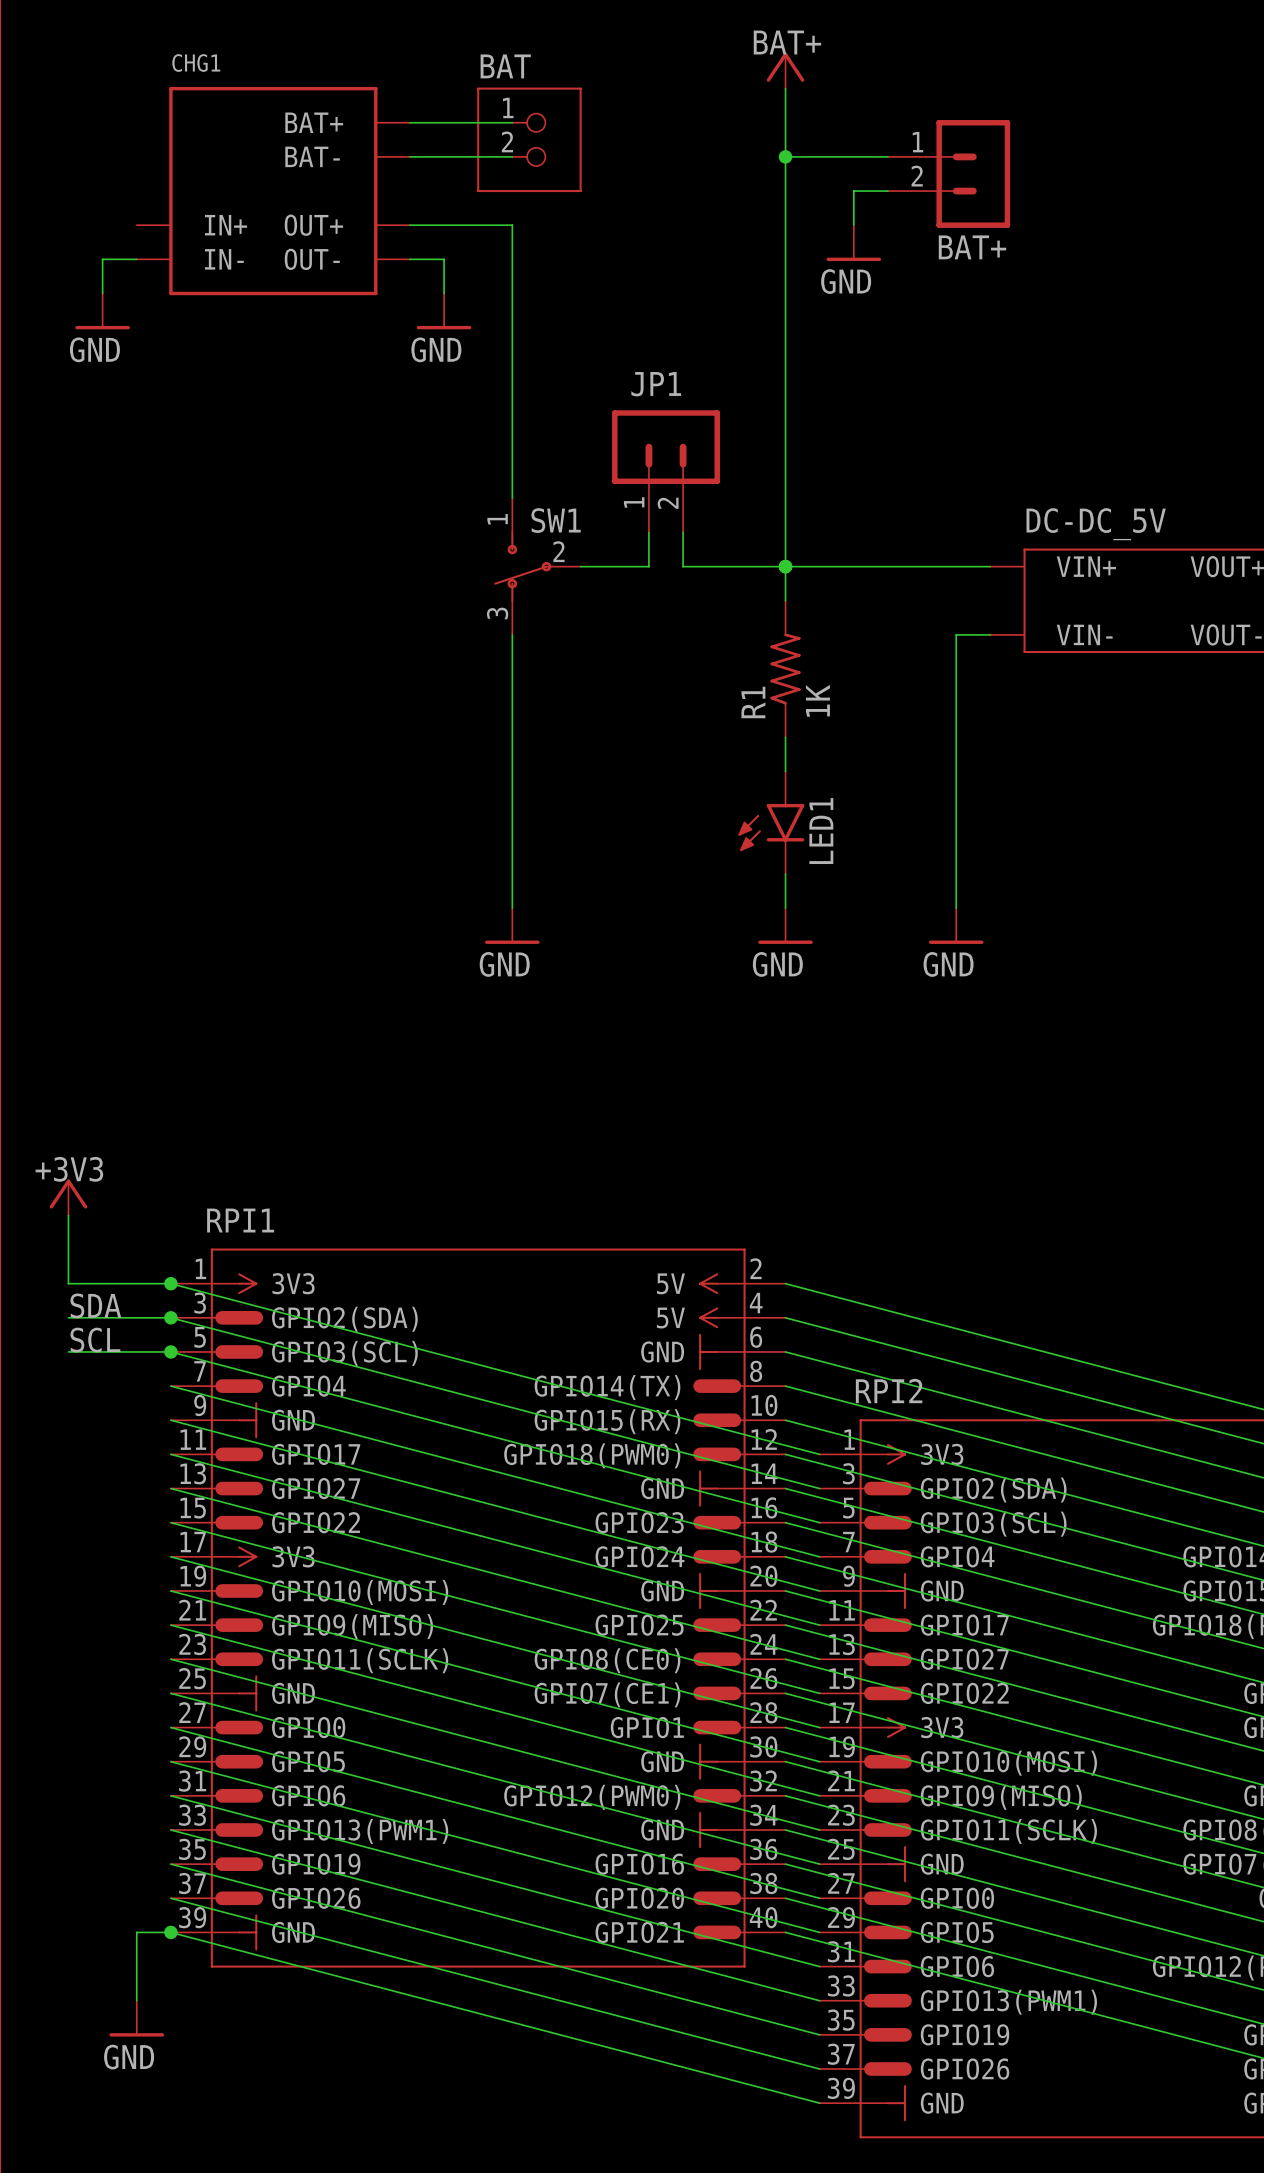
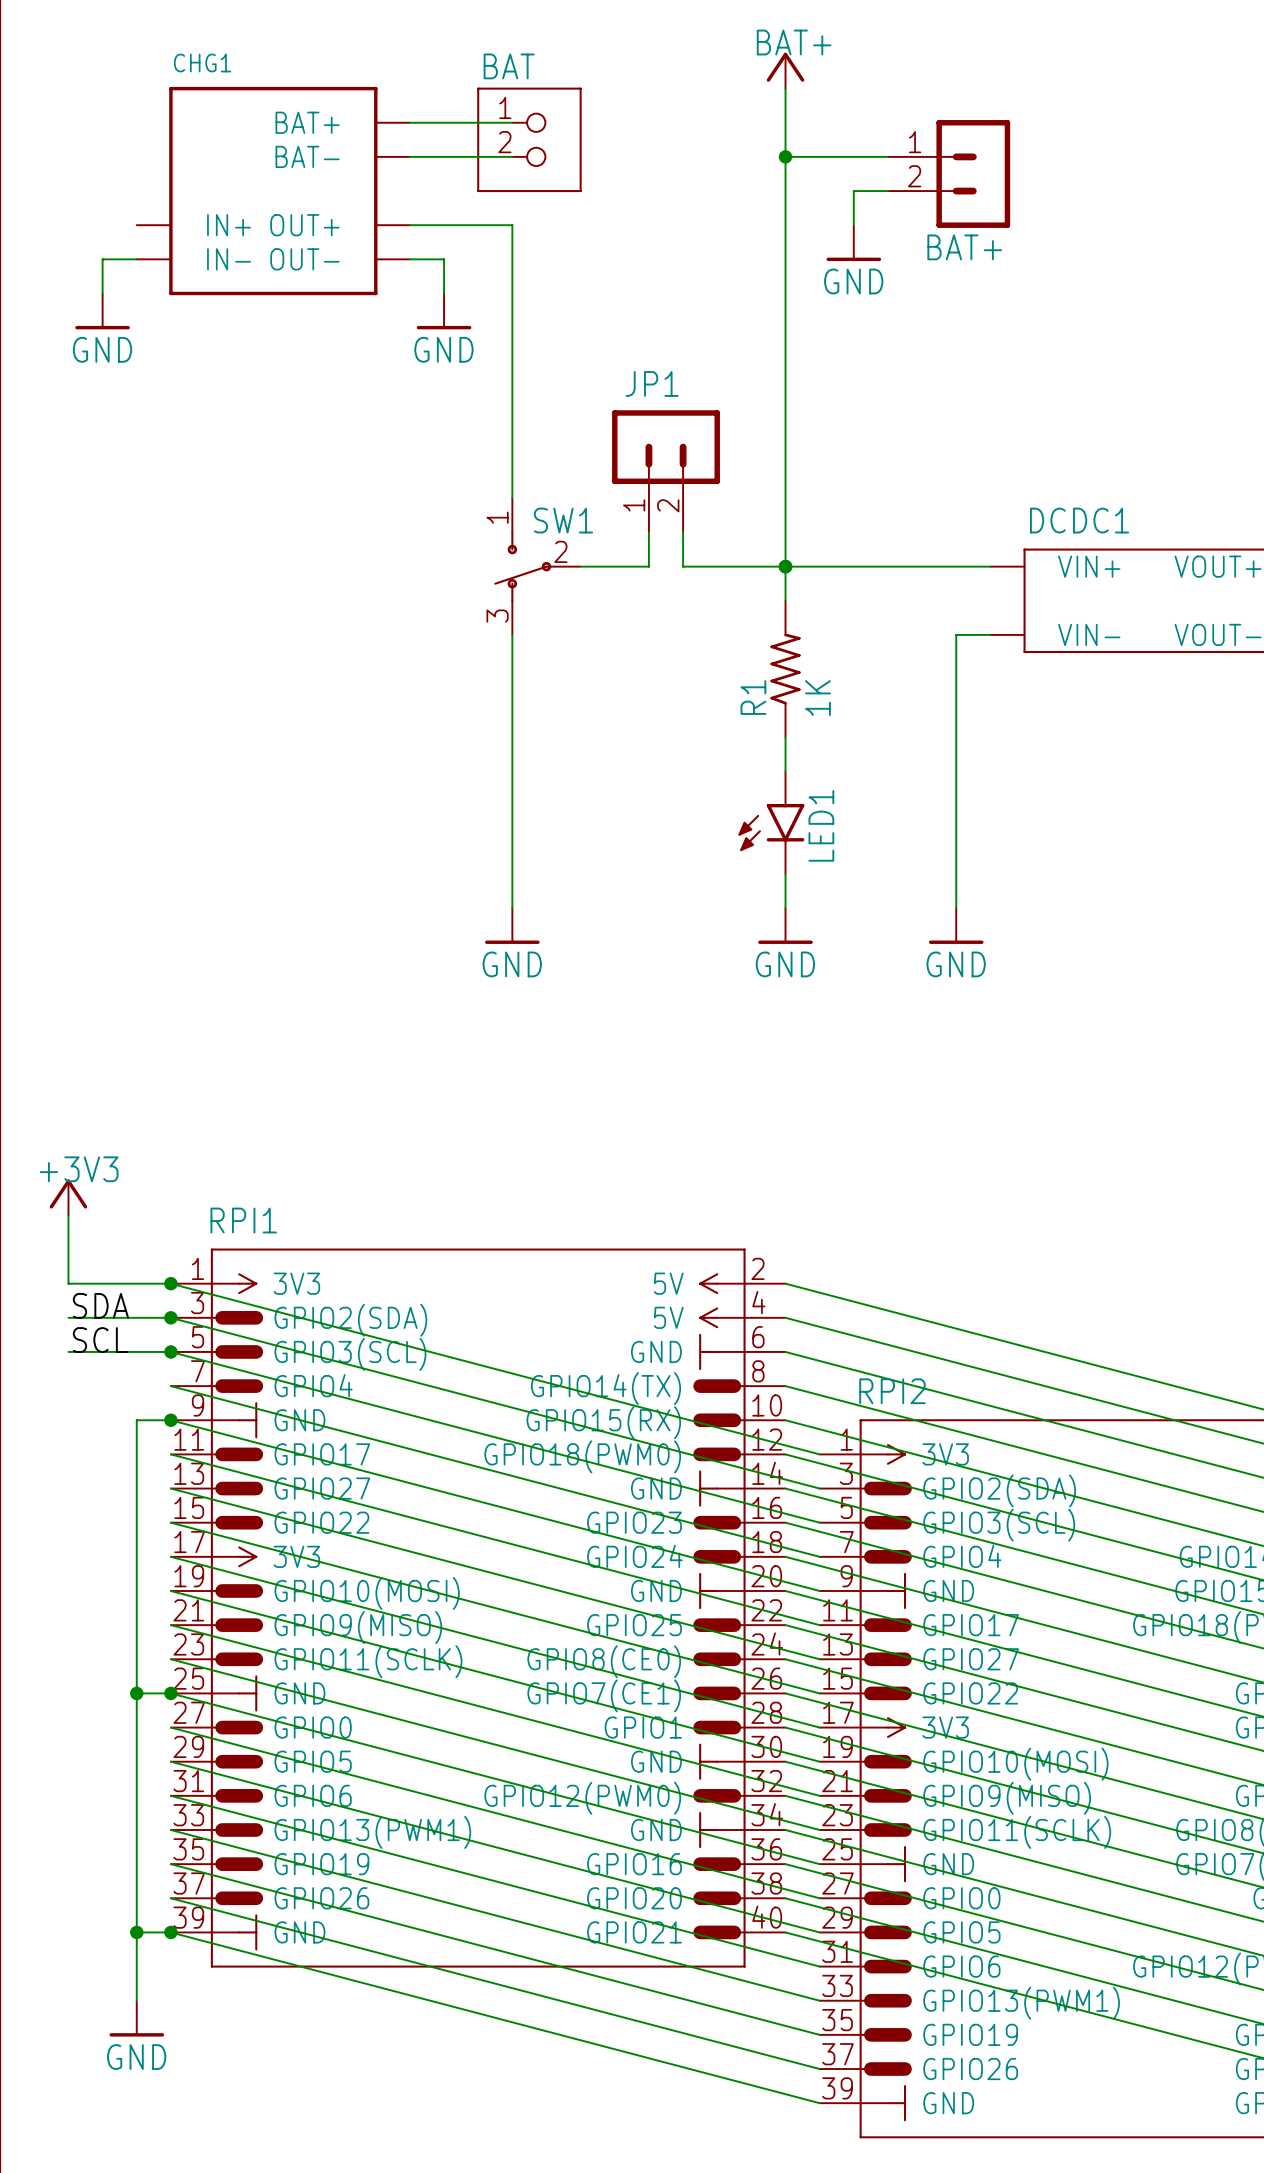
DC-DC_5V name: DC-DC_5V (1096, 524) -> DCDC1 (1079, 520)
wire: none -> (170, 1420) (136, 1420) (136, 1932)
junction: none -> (170, 1420)
wire: none -> (136, 1693) (170, 1693)
junction: none -> (136, 1693)
junction: none -> (170, 1693)
junction: none -> (136, 1932)

